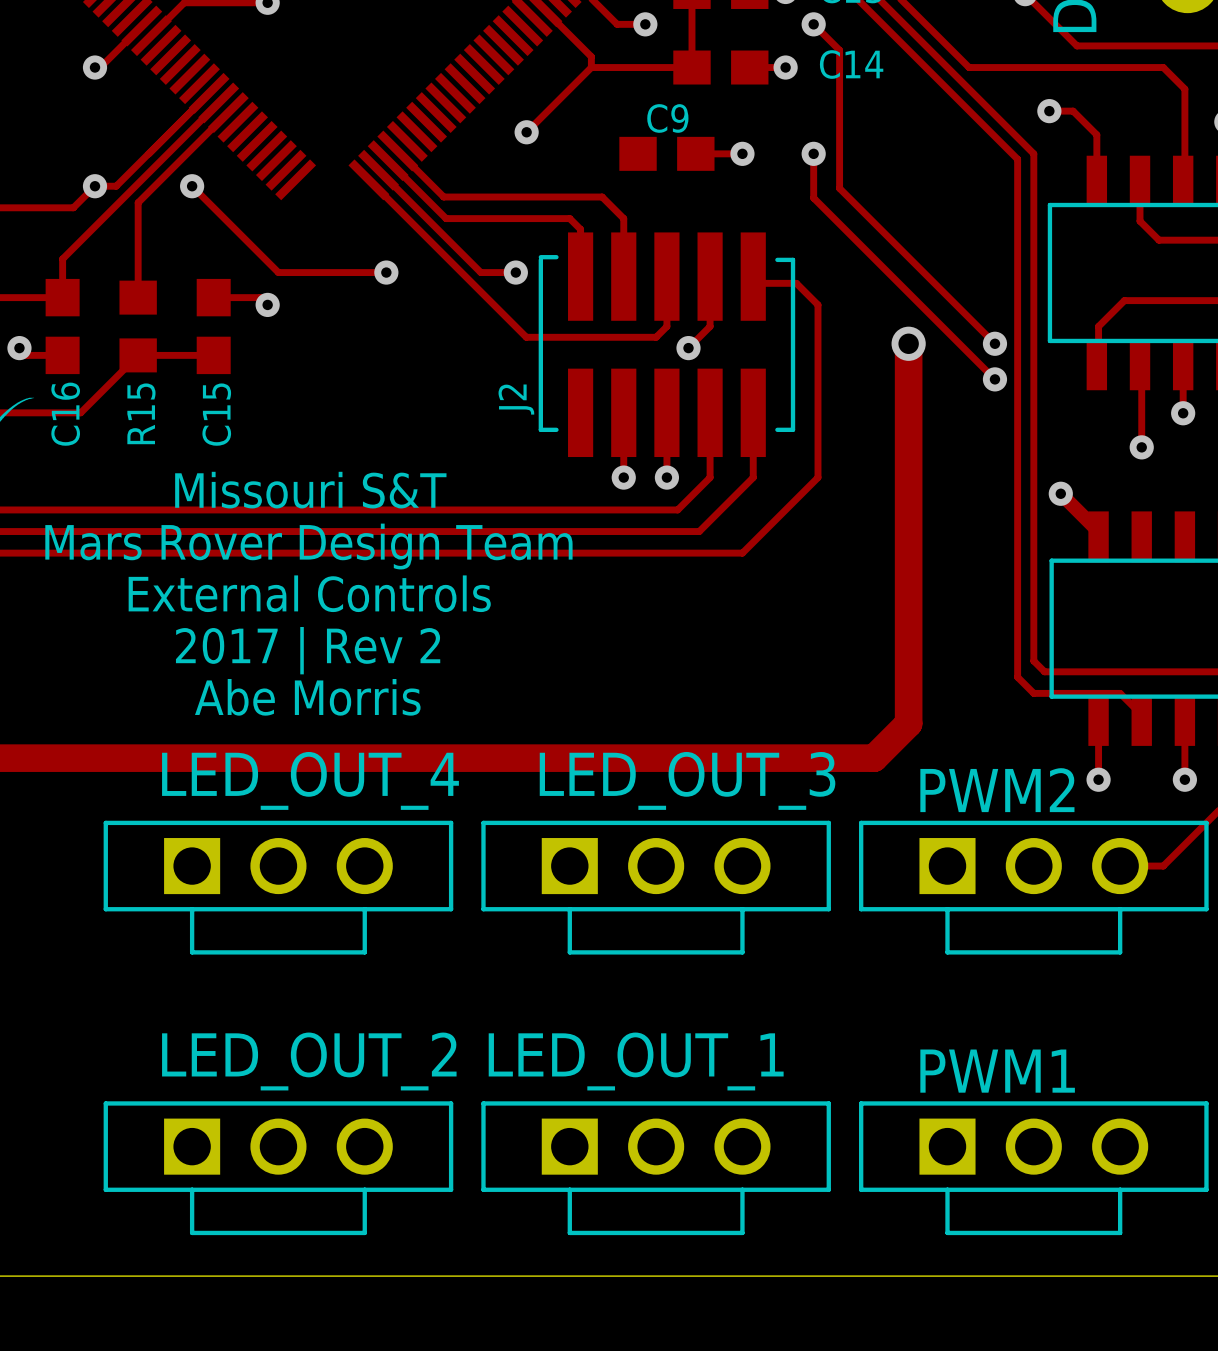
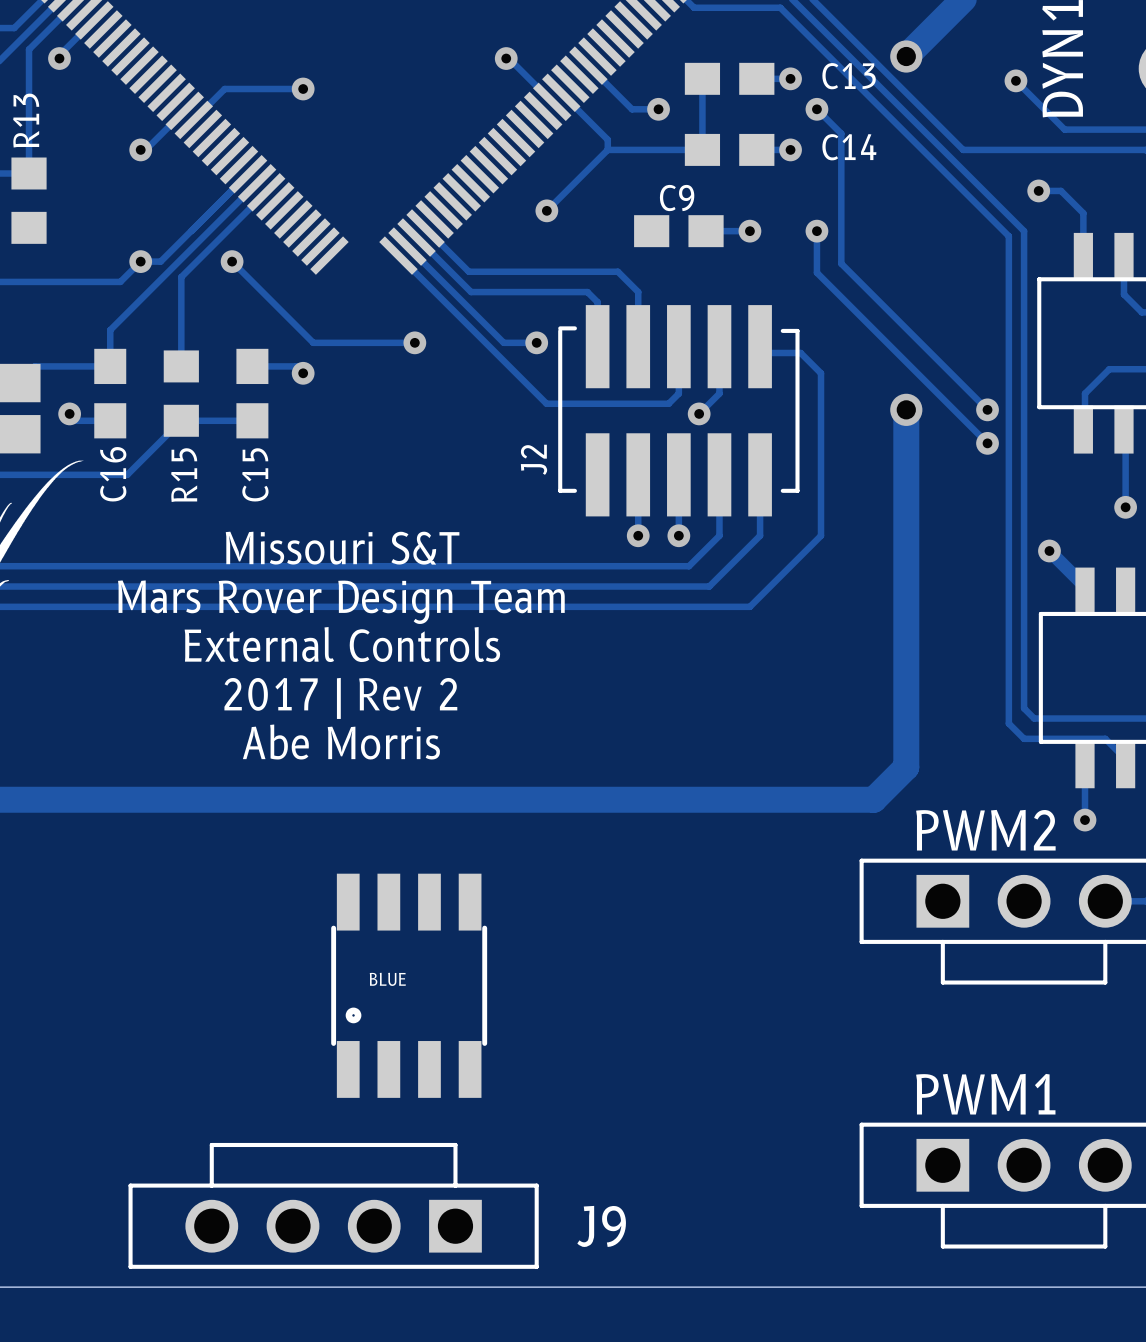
LED_OUT_4: (278, 887) -> none
LED_OUT_3: (656, 887) -> none
BLUE: none -> (409, 985)
LED_OUT_2: (278, 1168) -> none
LED_OUT_1: (656, 1168) -> none
J9: none -> (333, 1205)

